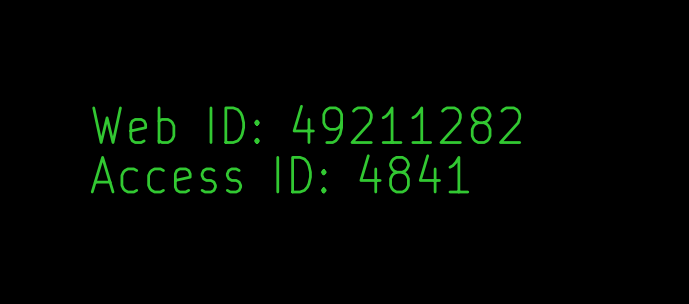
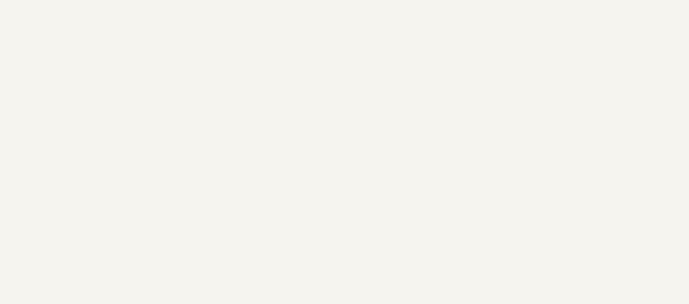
text: Web ID: 49211282 (306, 124) -> none
text: Access ID: 4841 (280, 173) -> none

